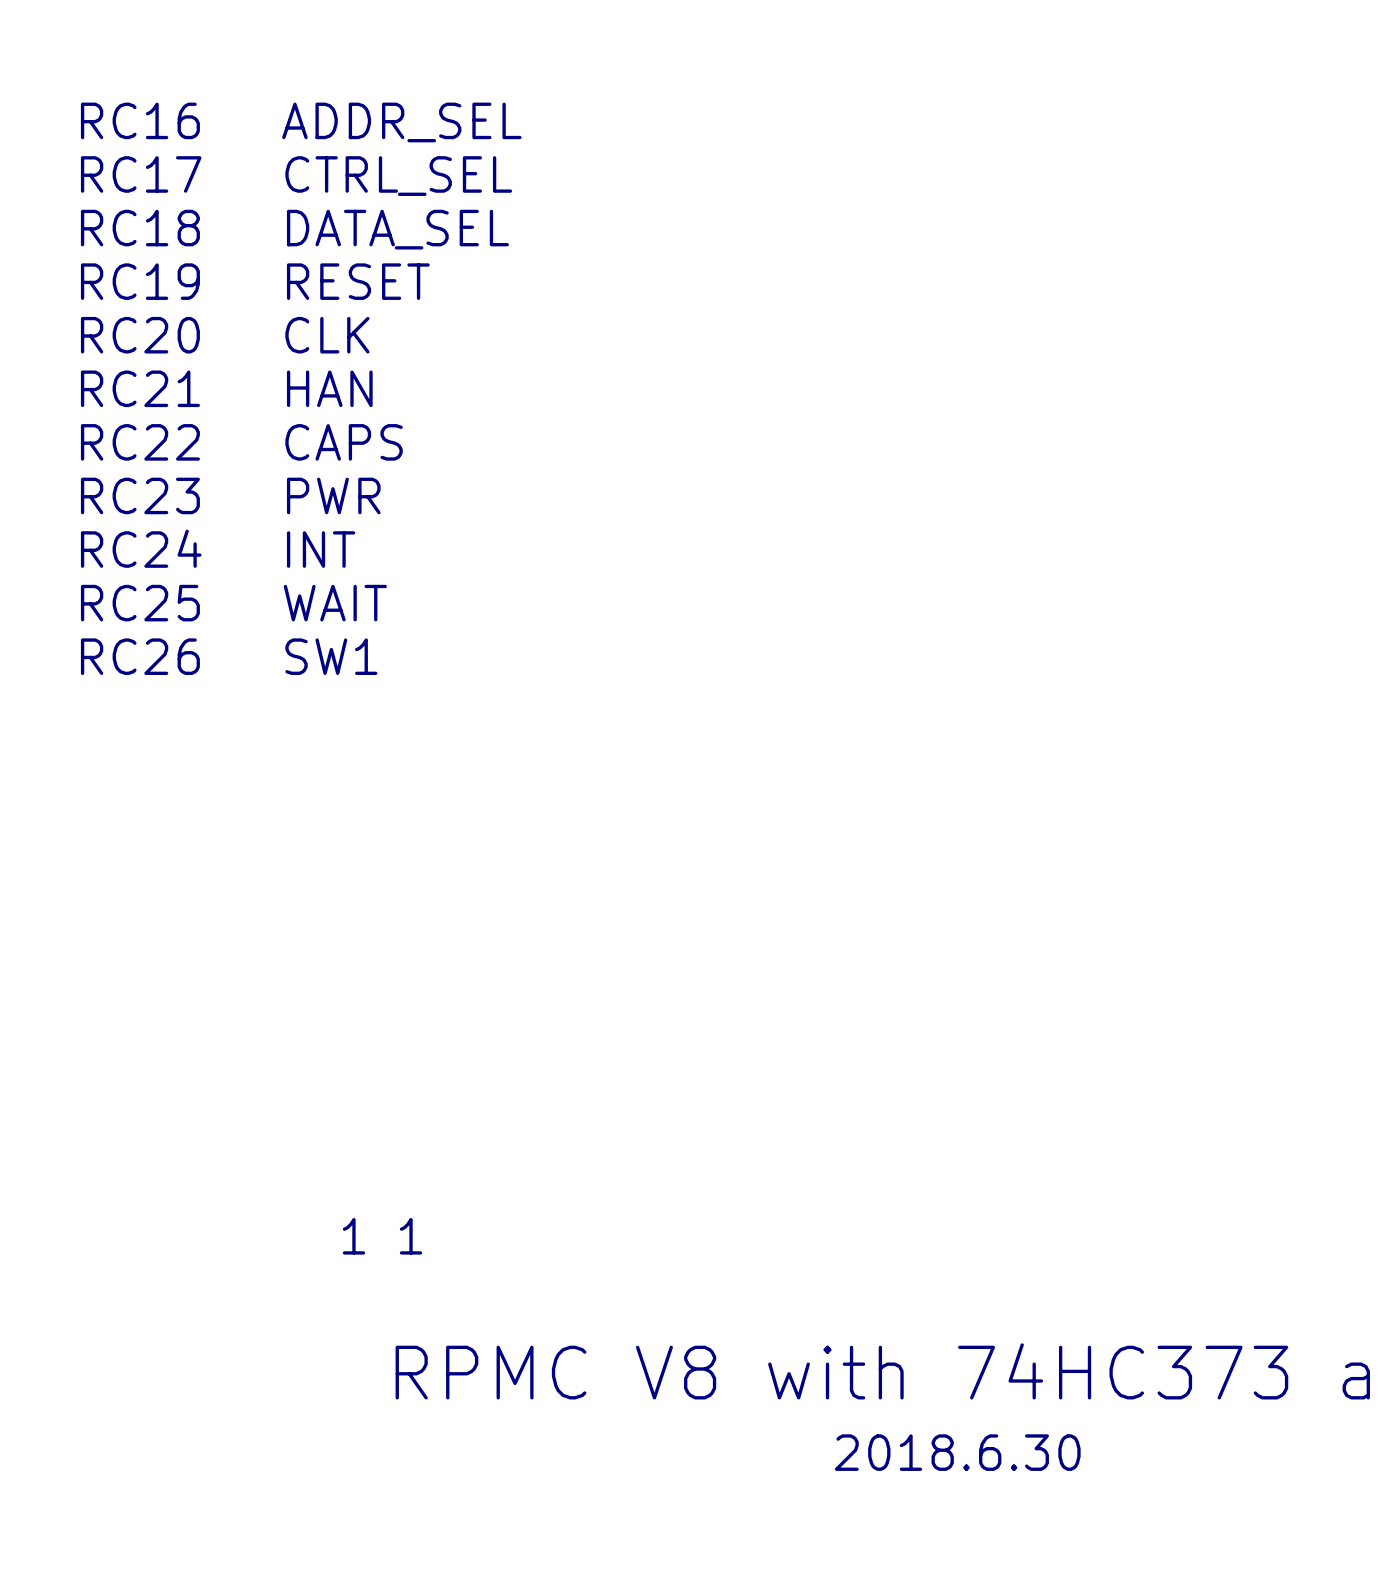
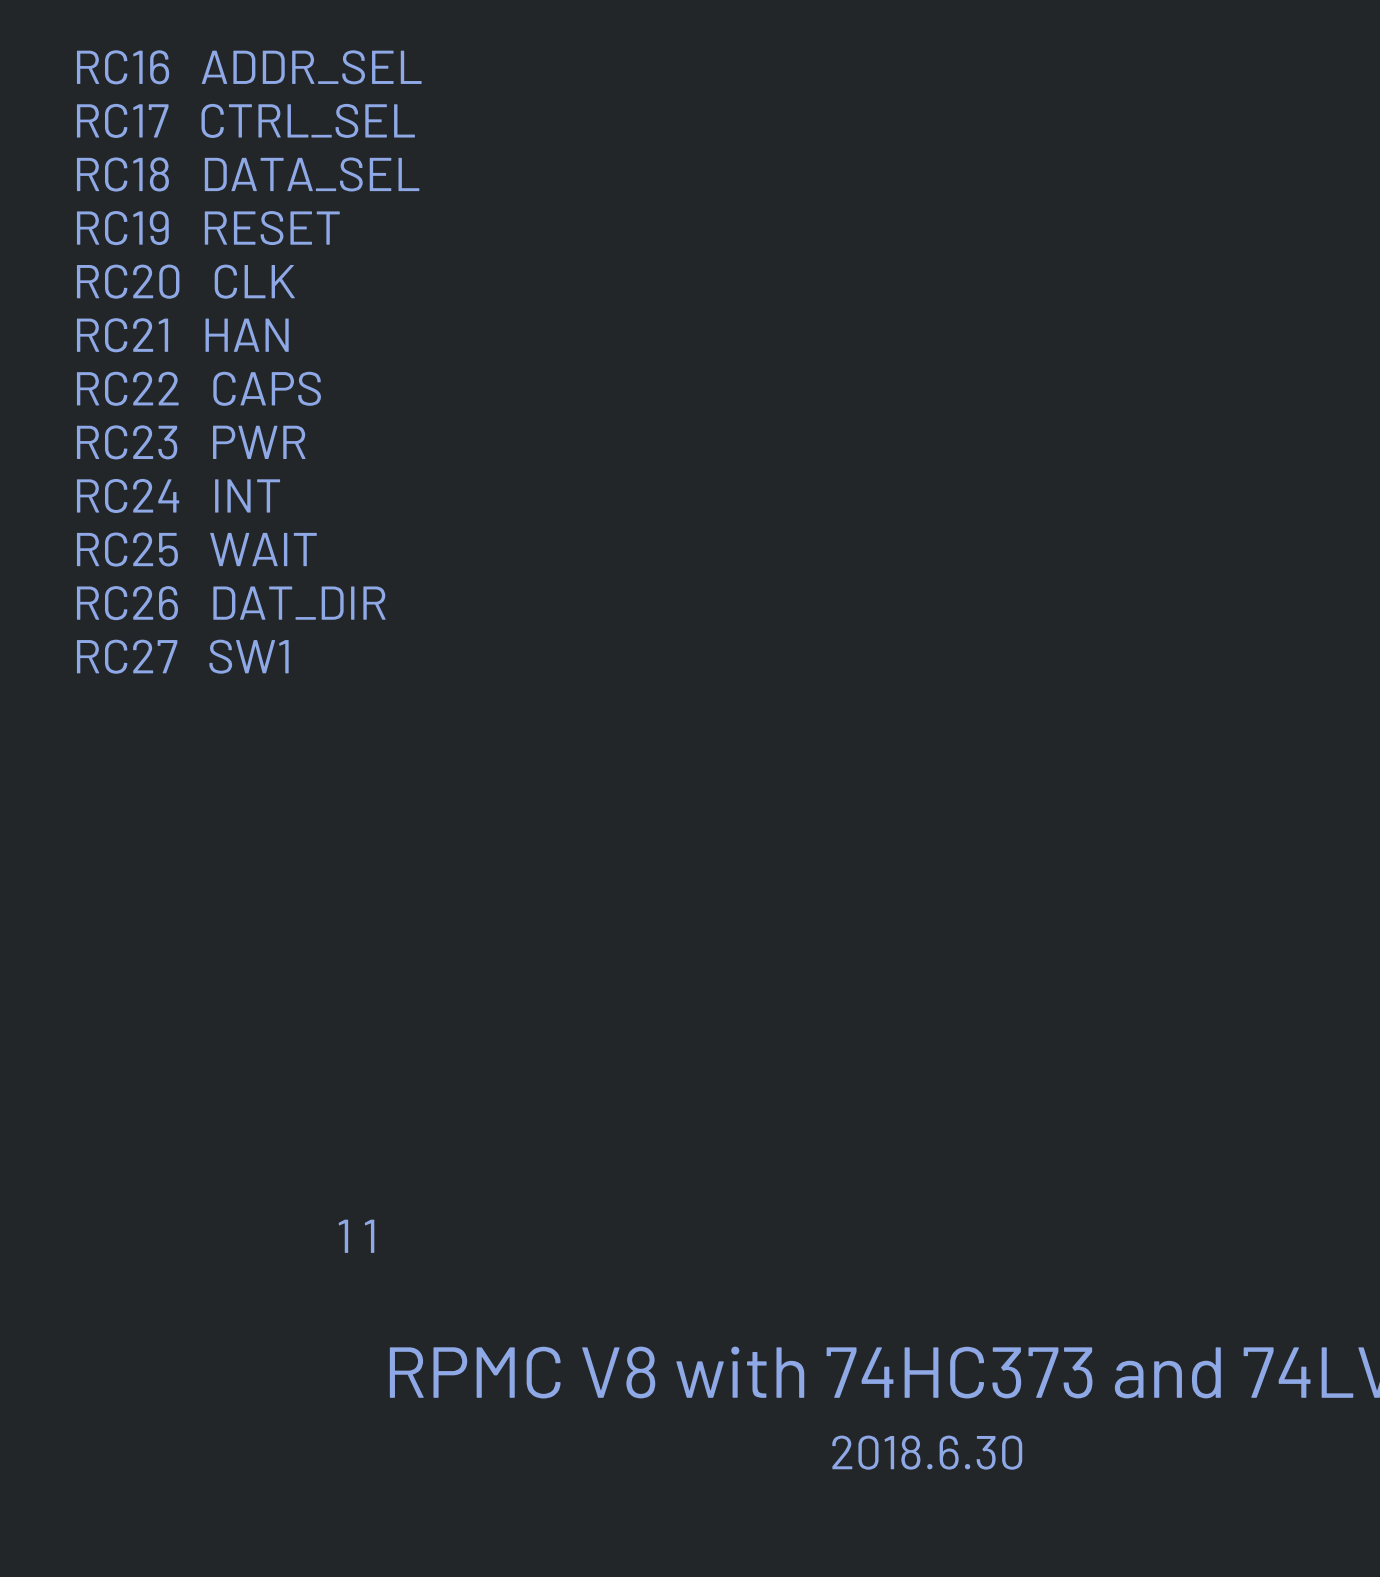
text: none -> RC16 ADDR_SEL (249, 67)
text: RC16 ADDR_SEL (301, 122) -> RC17 CTRL_SEL (245, 120)
text: RC17 CTRL_SEL (296, 176) -> RC18 DATA_SEL (248, 174)
text: RC18 DATA_SEL (294, 229) -> RC19 RESET (208, 228)
text: RC19 RESET (255, 281) -> RC20 CLK (185, 281)
text: RC20 CLK (225, 335) -> RC21 HAN (182, 335)
text: RC21 HAN (226, 388) -> RC22 CAPS (198, 388)
text: RC22 CAPS (241, 442) -> RC23 PWR (191, 442)
text: RC23 PWR (230, 495) -> RC24 INT (178, 495)
text: RC24 INT (218, 548) -> RC25 WAIT (196, 549)
text: RC25 WAIT (233, 603) -> RC26 DAT_DIR (231, 603)
text: RC26 SW1 (229, 656) -> RC27 SW1 (182, 656)

